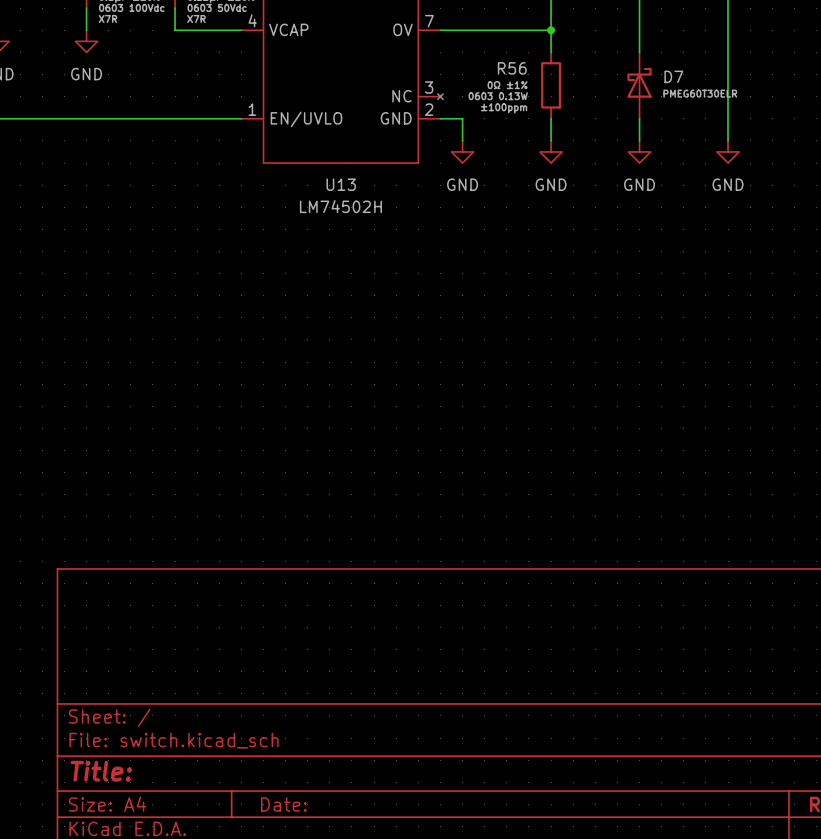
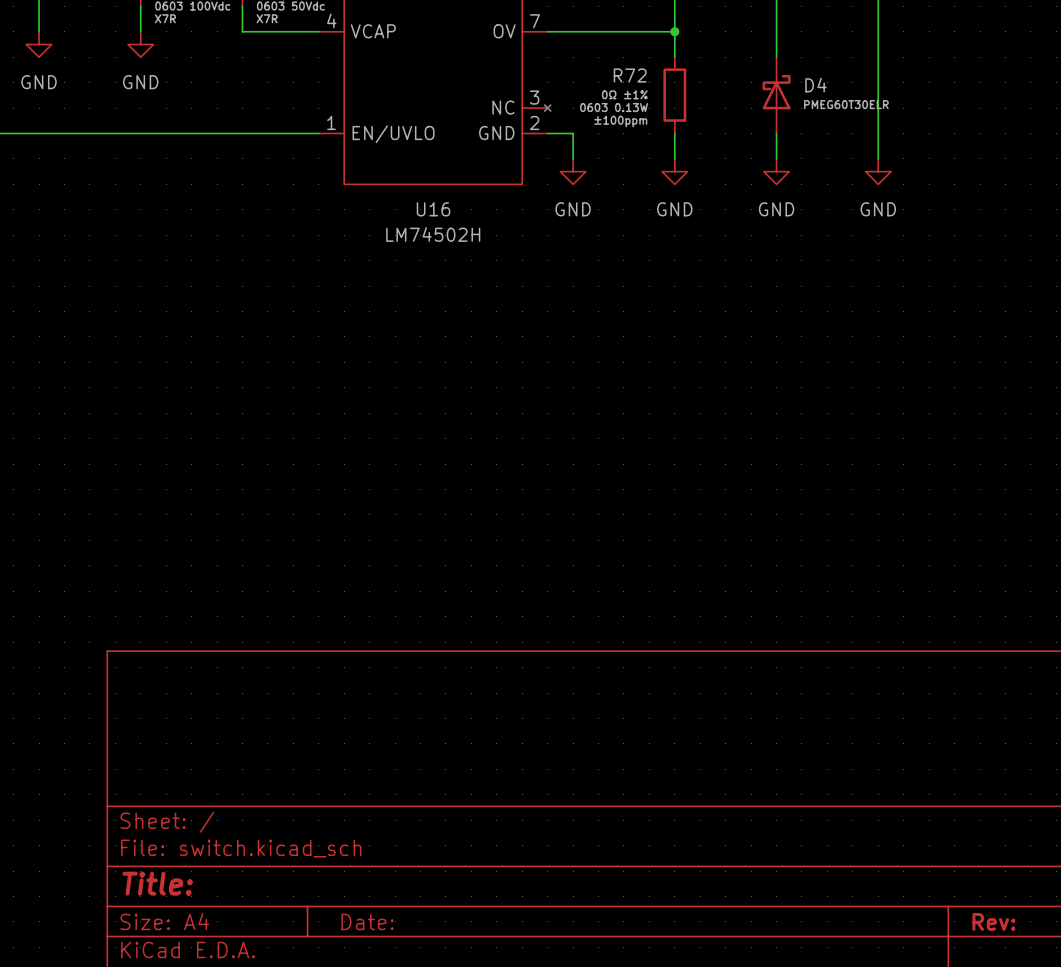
R56 name: R56 (512, 68) -> R72 (630, 75)
D7 name: D7 (673, 76) -> D4 (816, 85)
U13 name: U13 (341, 184) -> U16 (433, 209)

